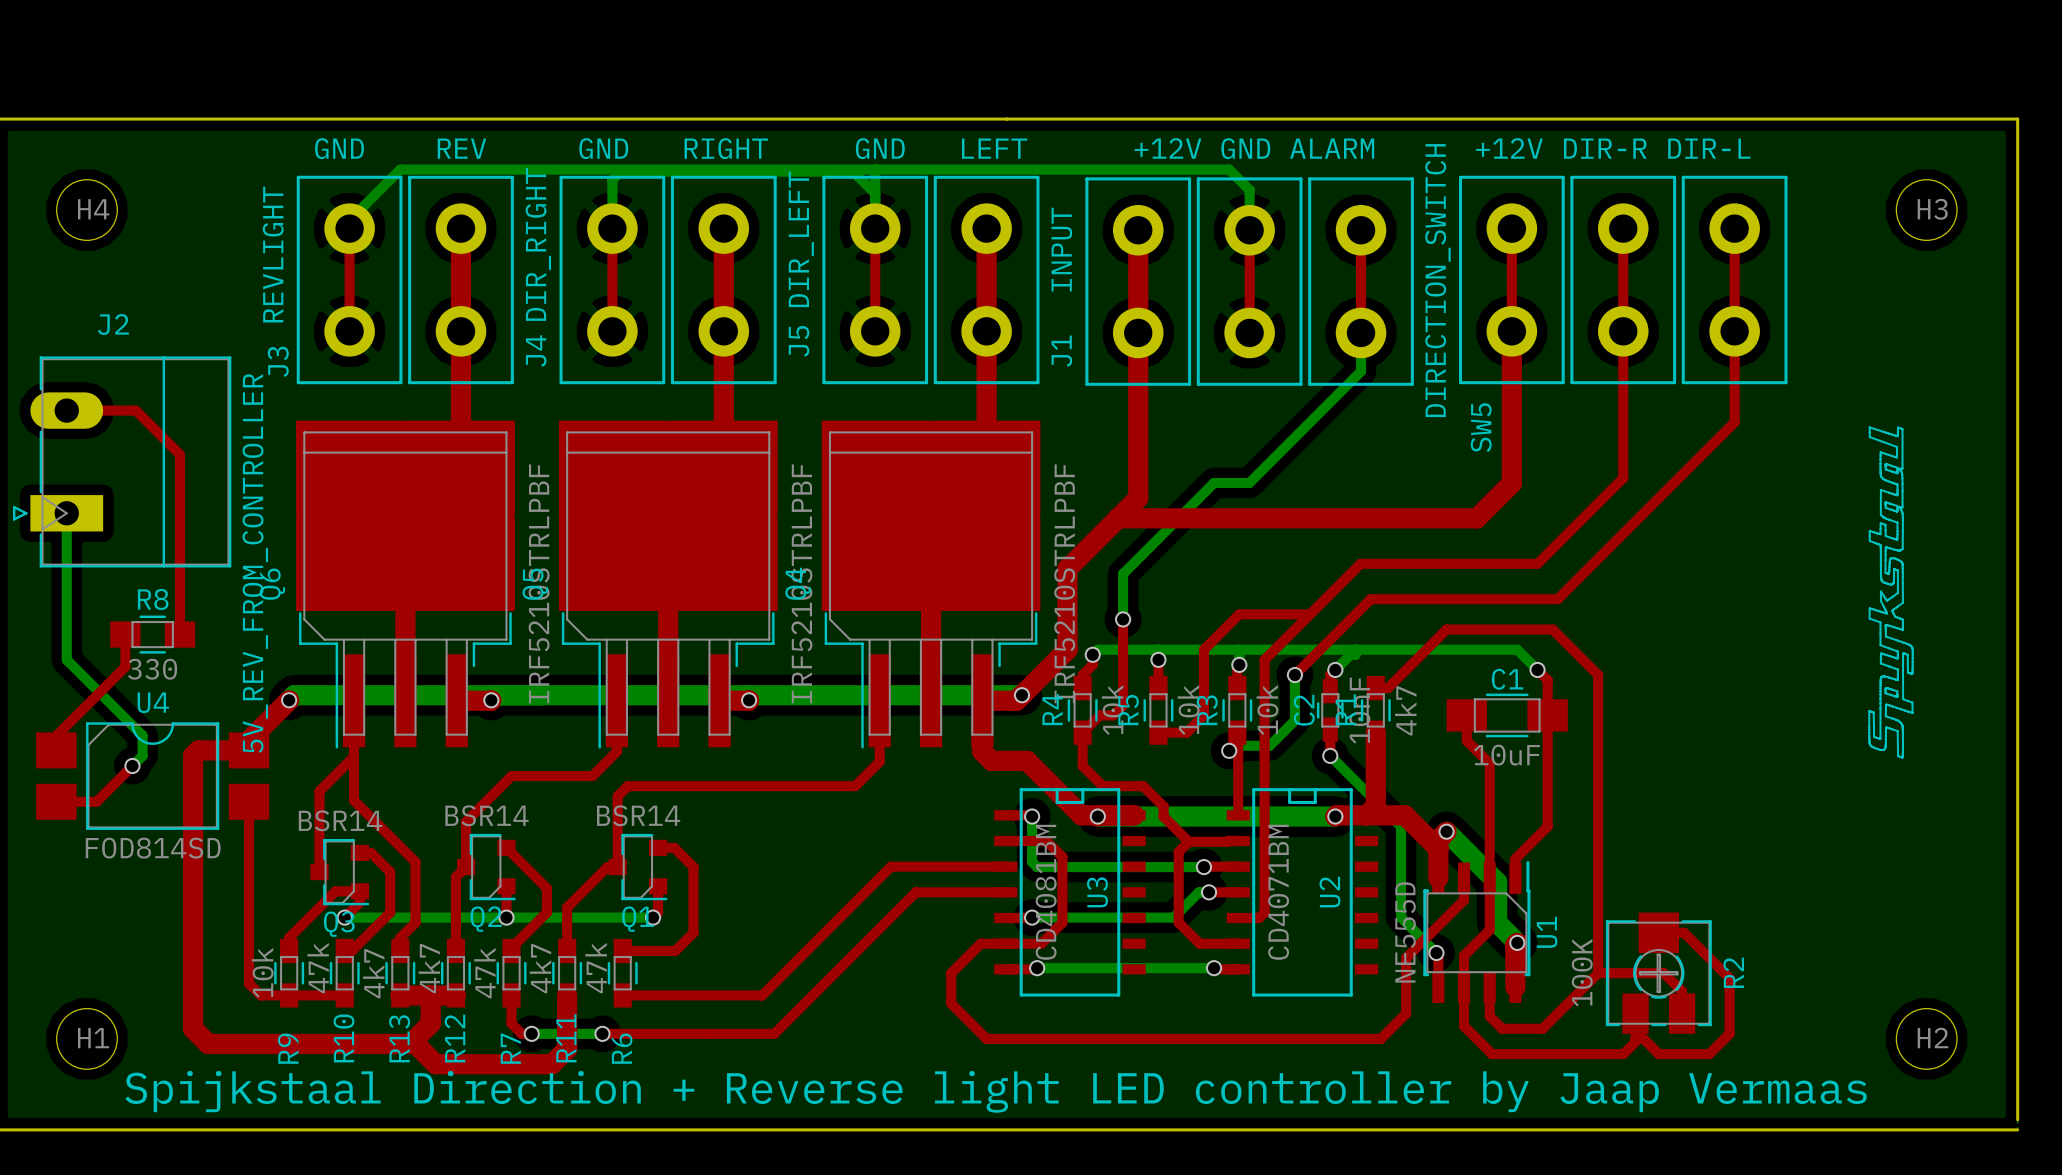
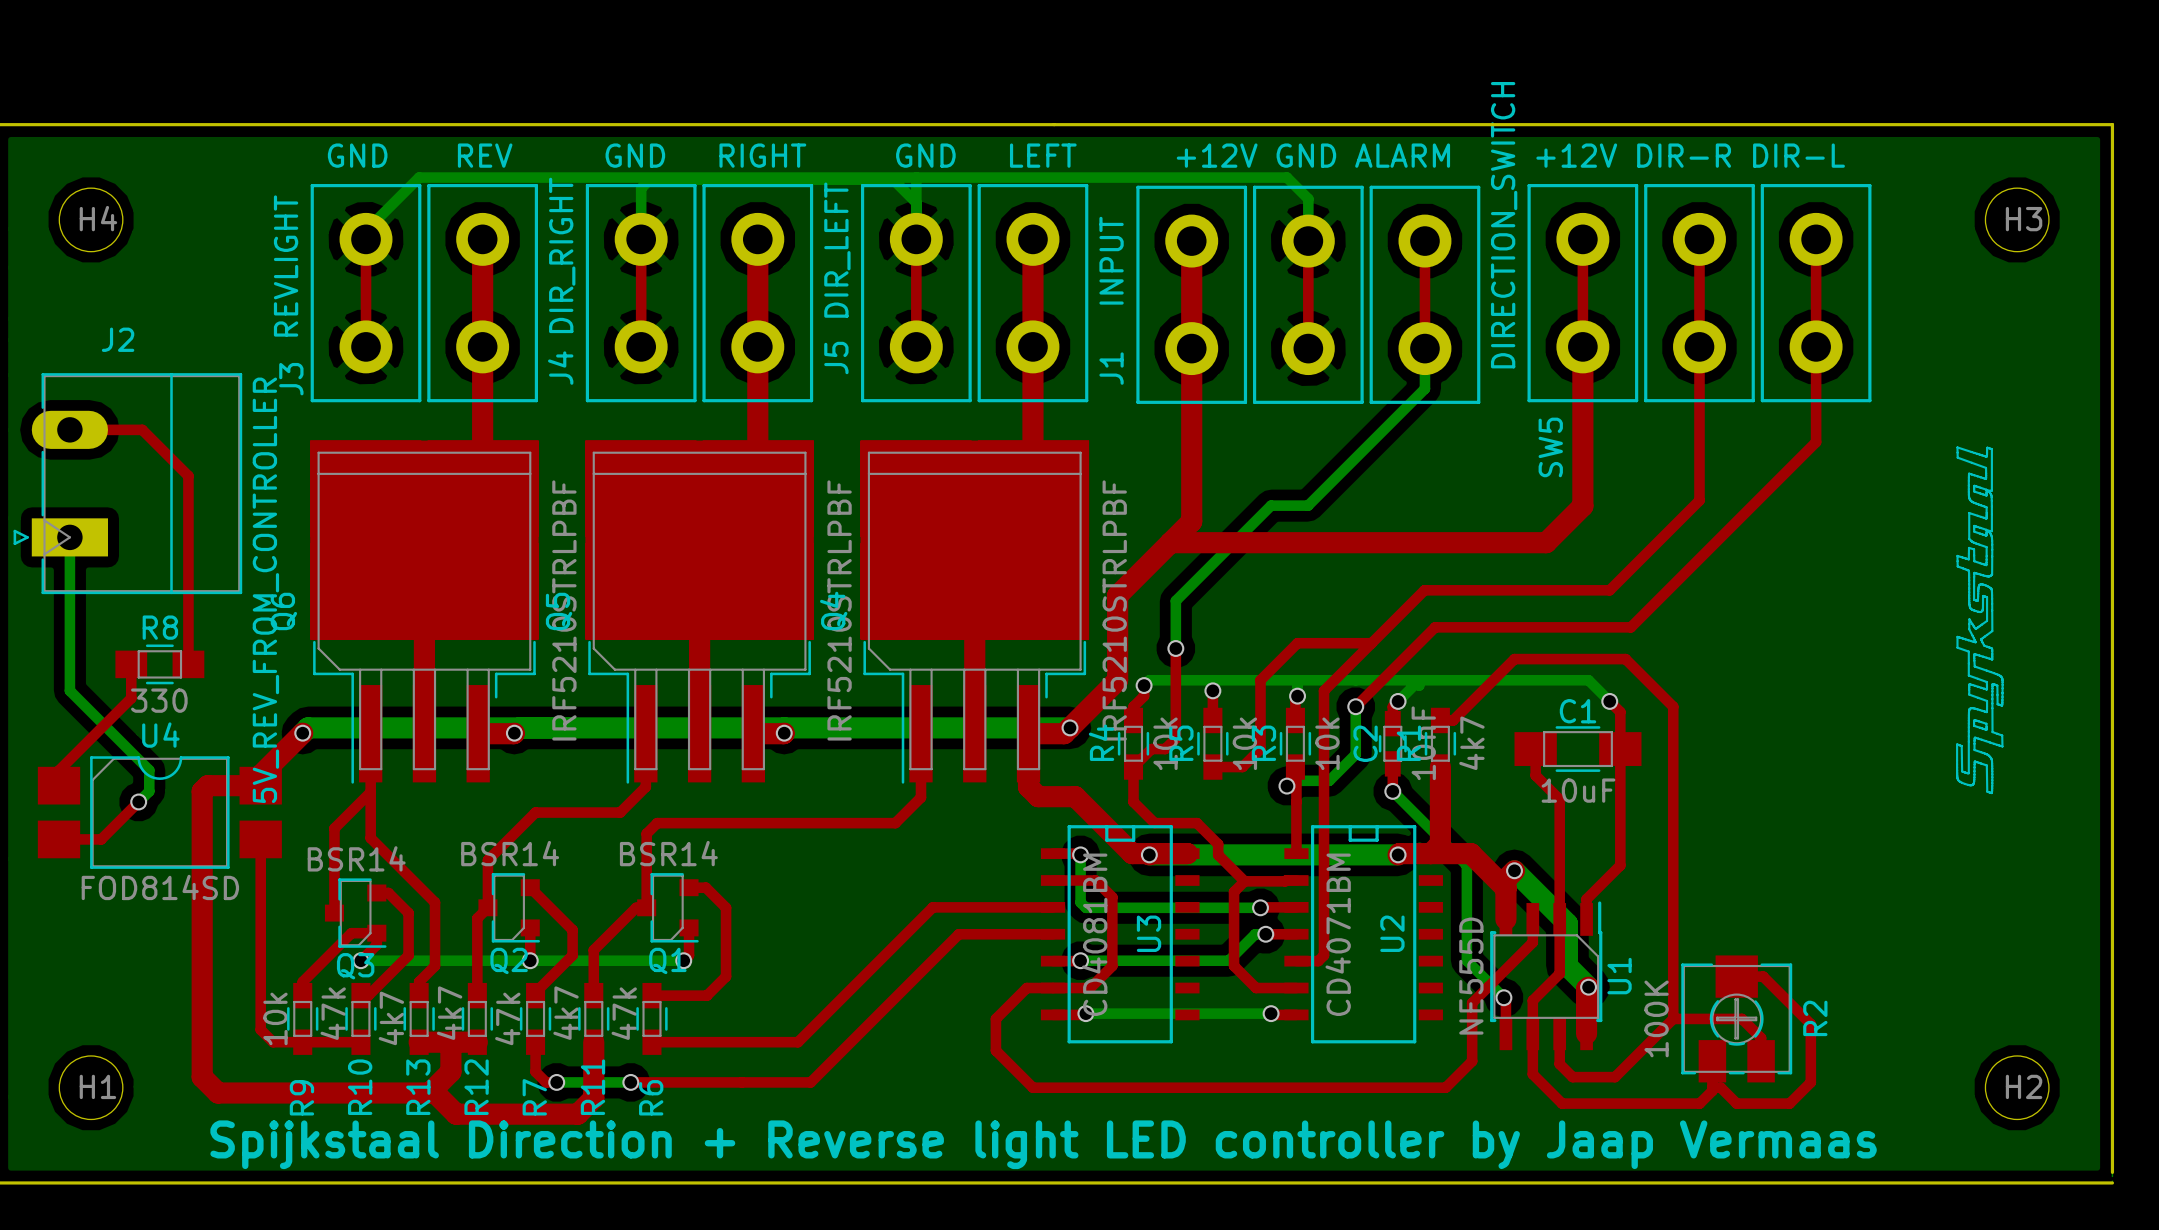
SW5 value position: DIRECTION_SWITCH (1437, 280) -> DIRECTION_SWITCH (1504, 225)

